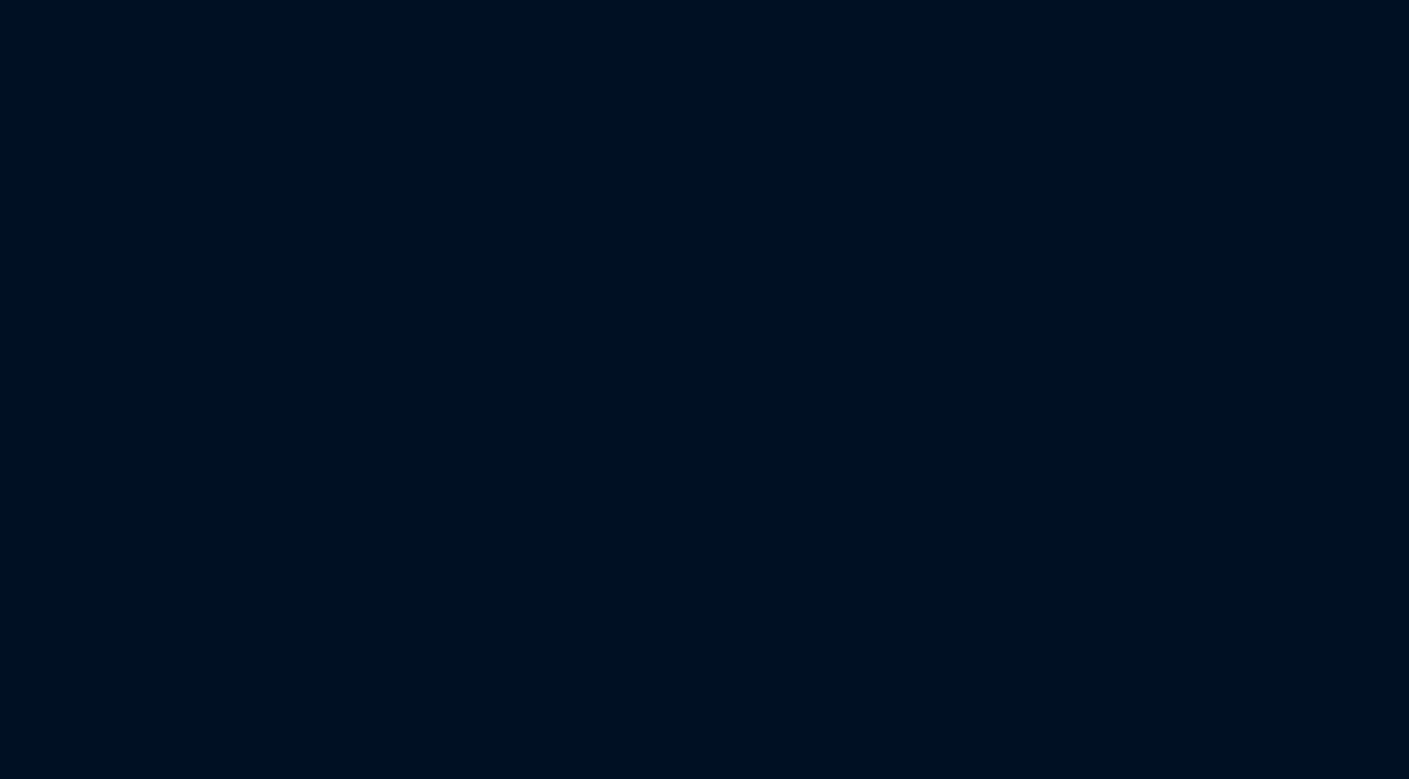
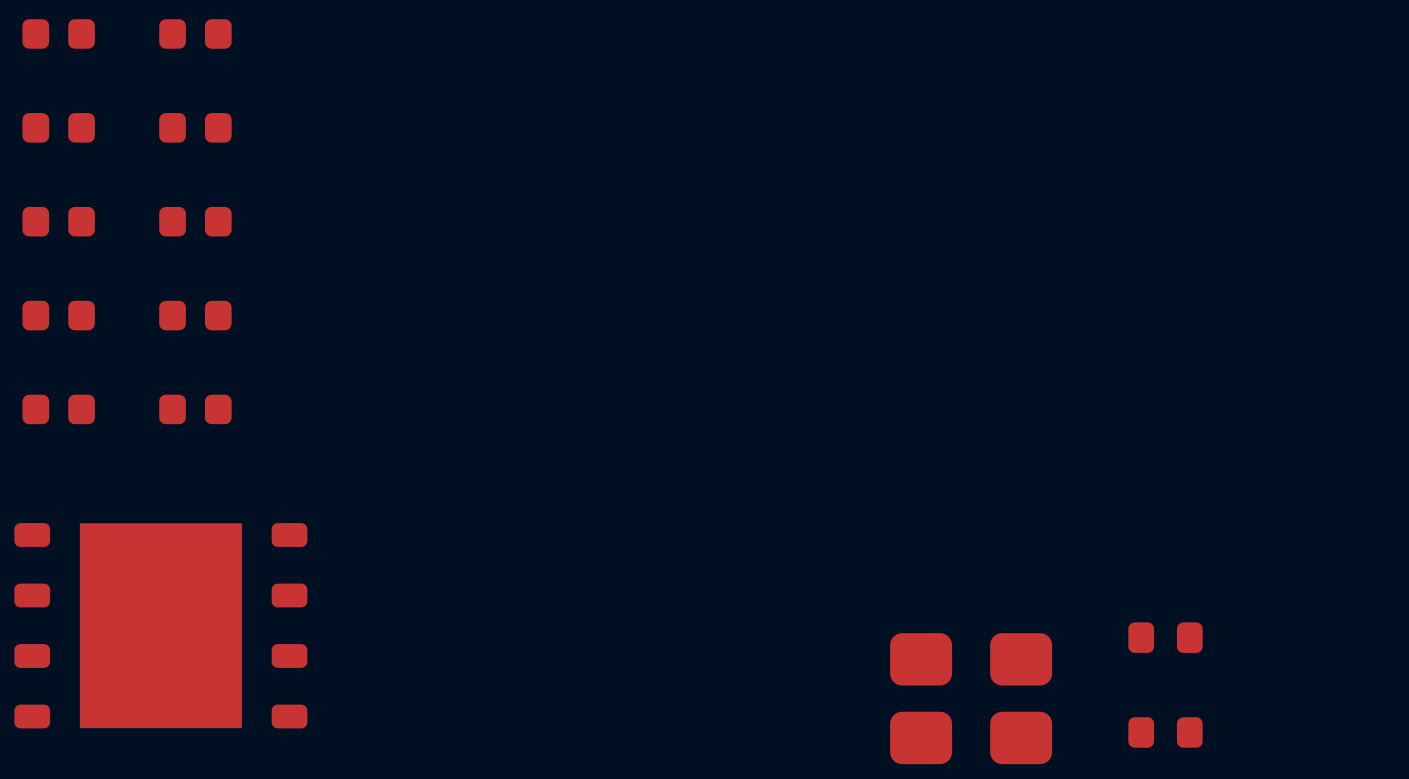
part: none -> (58, 33)
part: none -> (195, 33)
part: none -> (58, 127)
part: none -> (195, 127)
part: none -> (58, 221)
part: none -> (195, 221)
part: none -> (58, 315)
part: none -> (195, 315)
part: none -> (58, 409)
part: none -> (195, 409)
part: none -> (160, 625)
part: none -> (1165, 637)
part: none -> (971, 698)
part: none -> (1165, 732)

